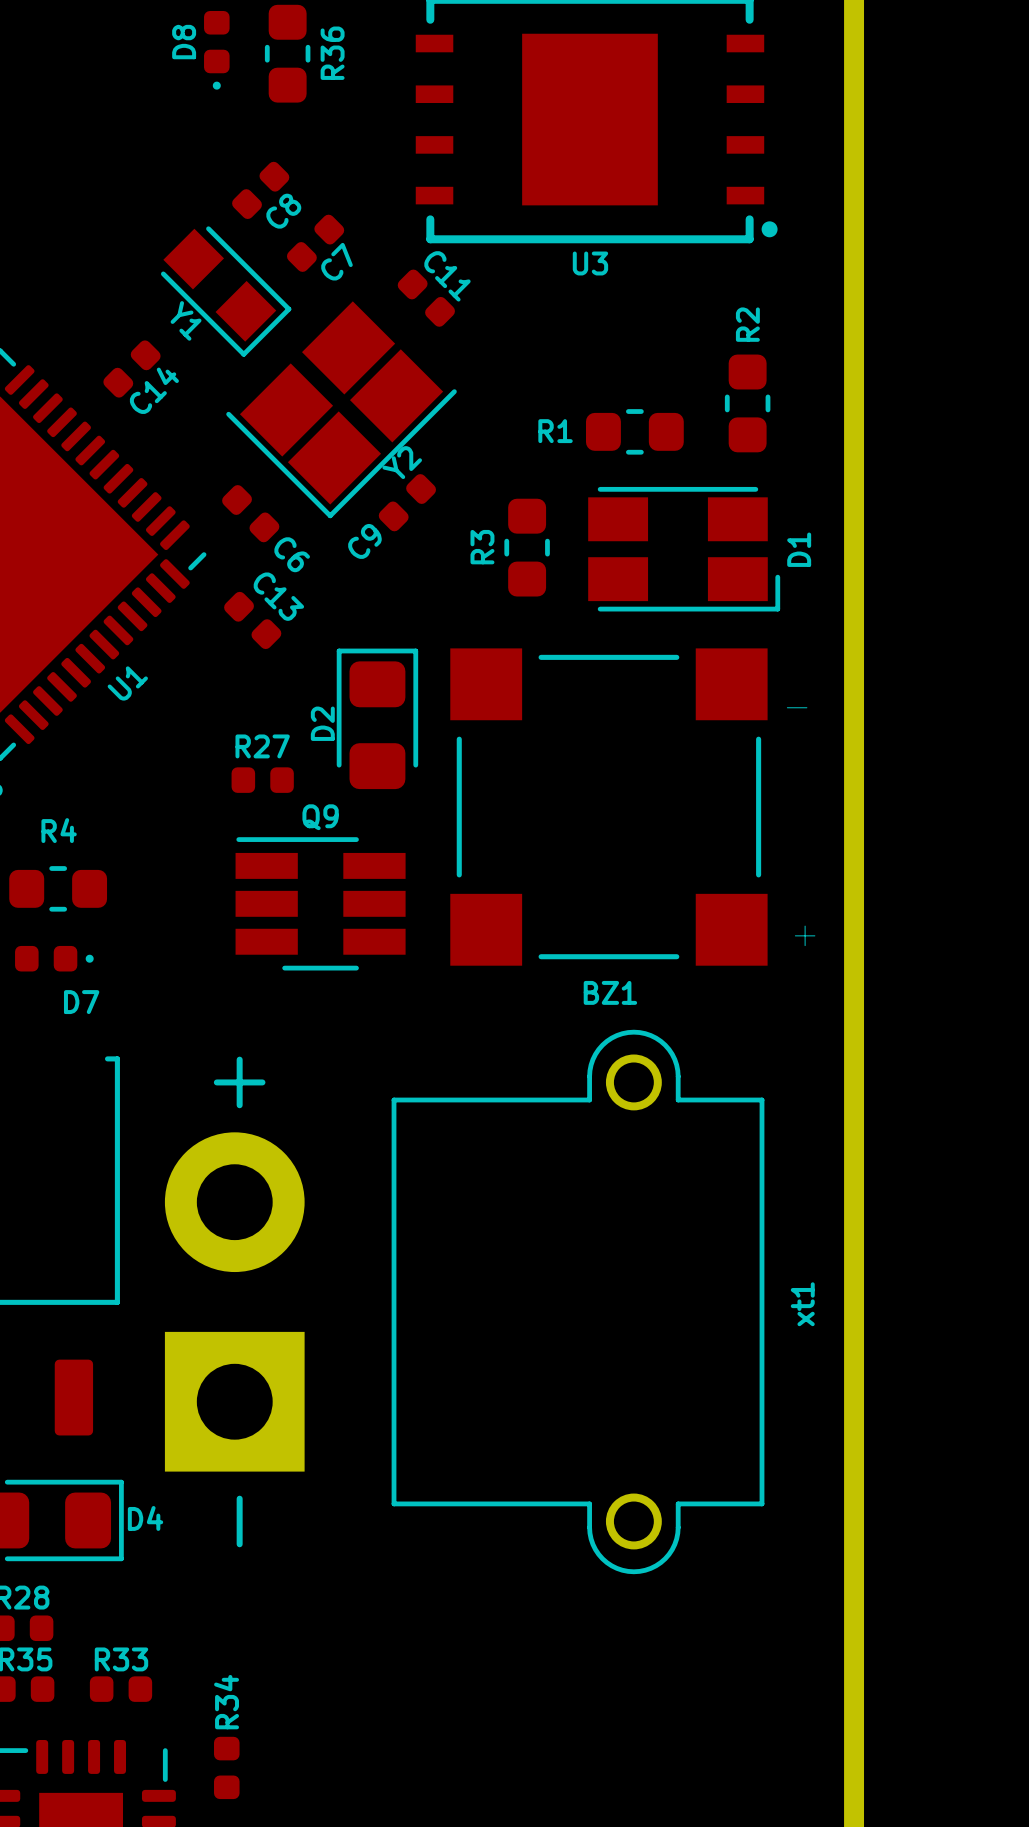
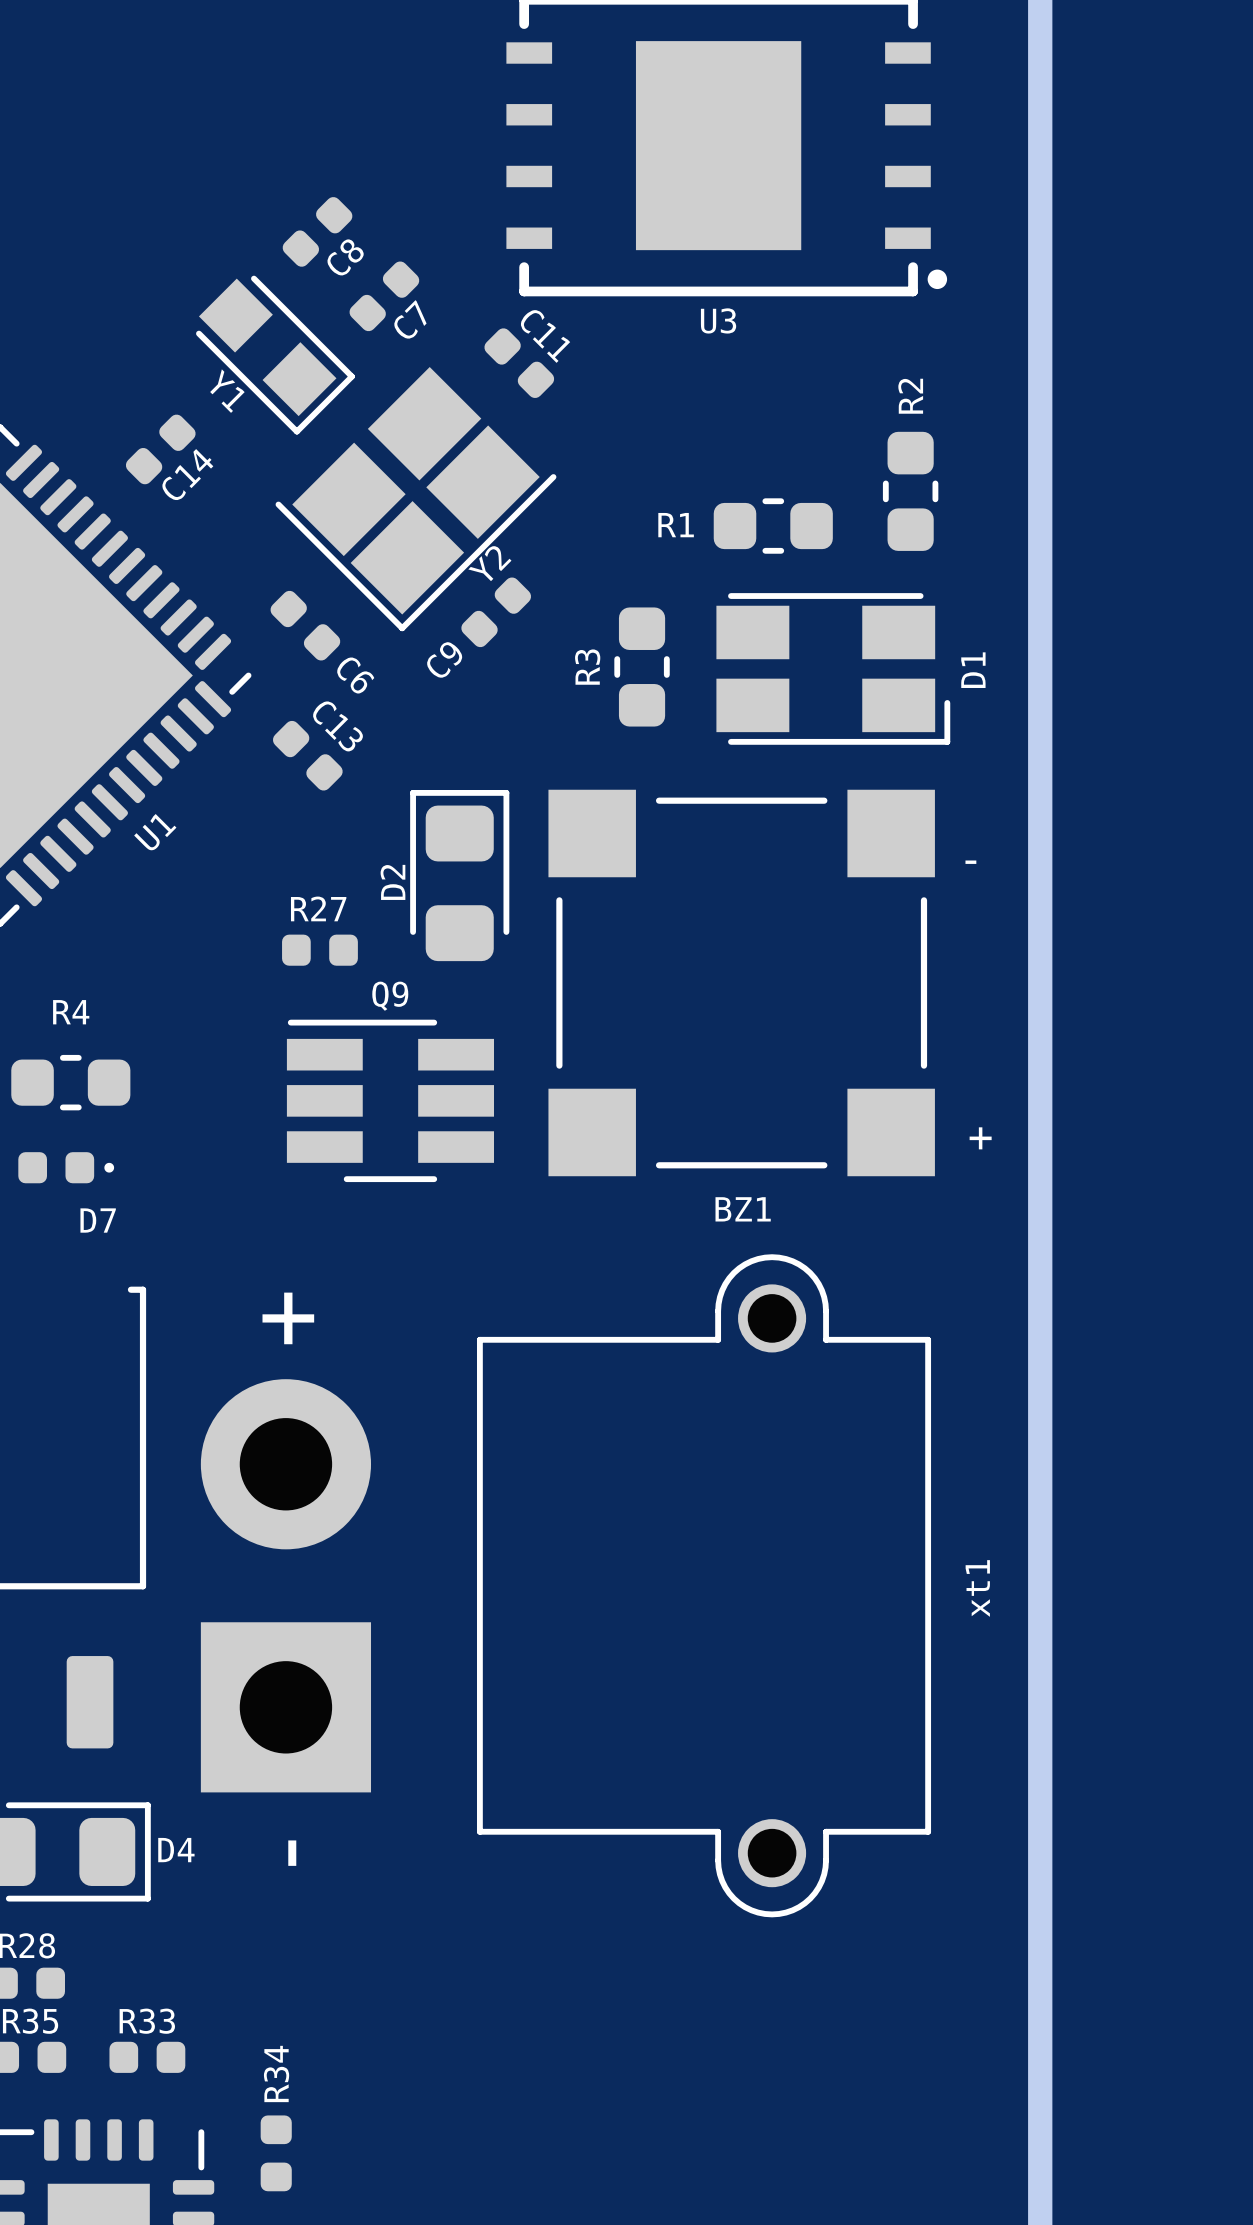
D8: (216, 50) -> none
R36: (287, 53) -> none

